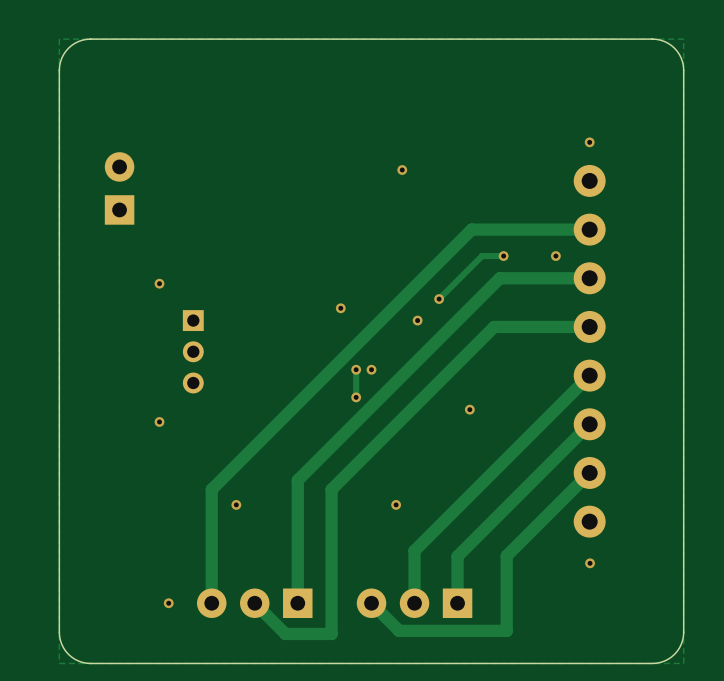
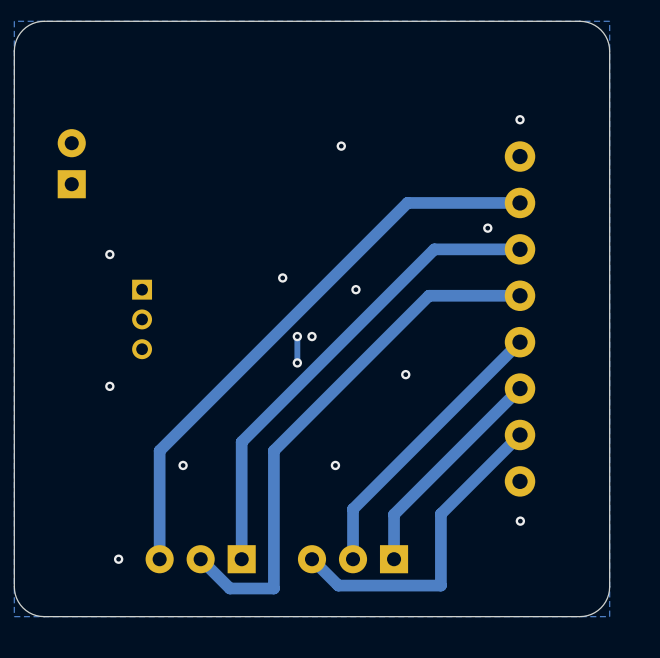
track: (503, 256) (482, 256) (439, 299) -> none
via: (503, 256) -> none
via: (439, 299) -> none

